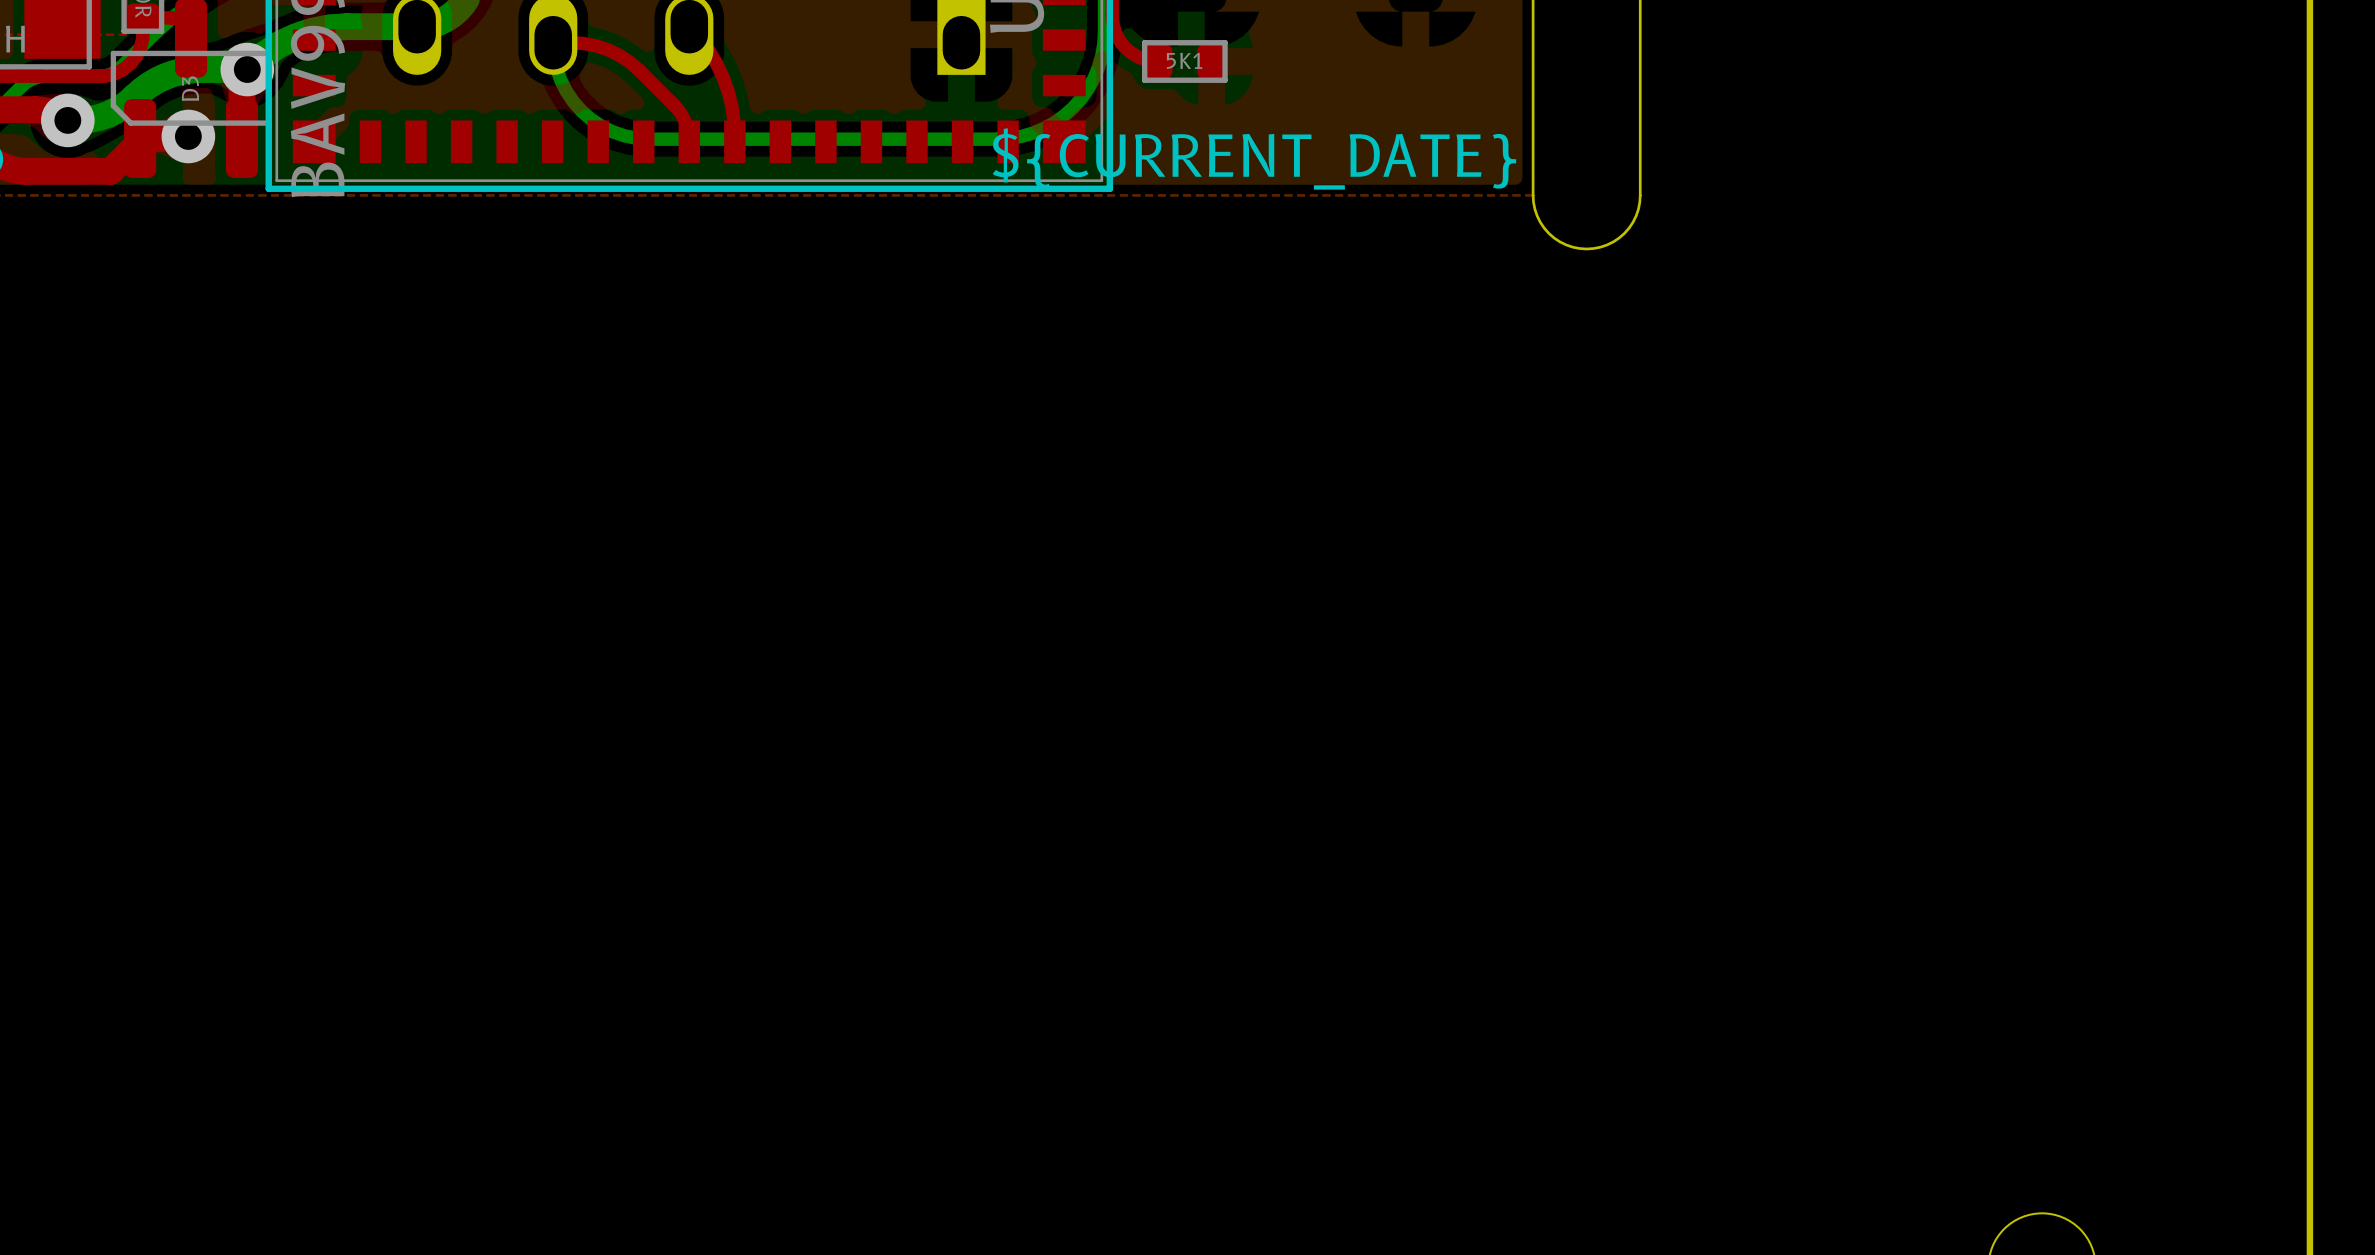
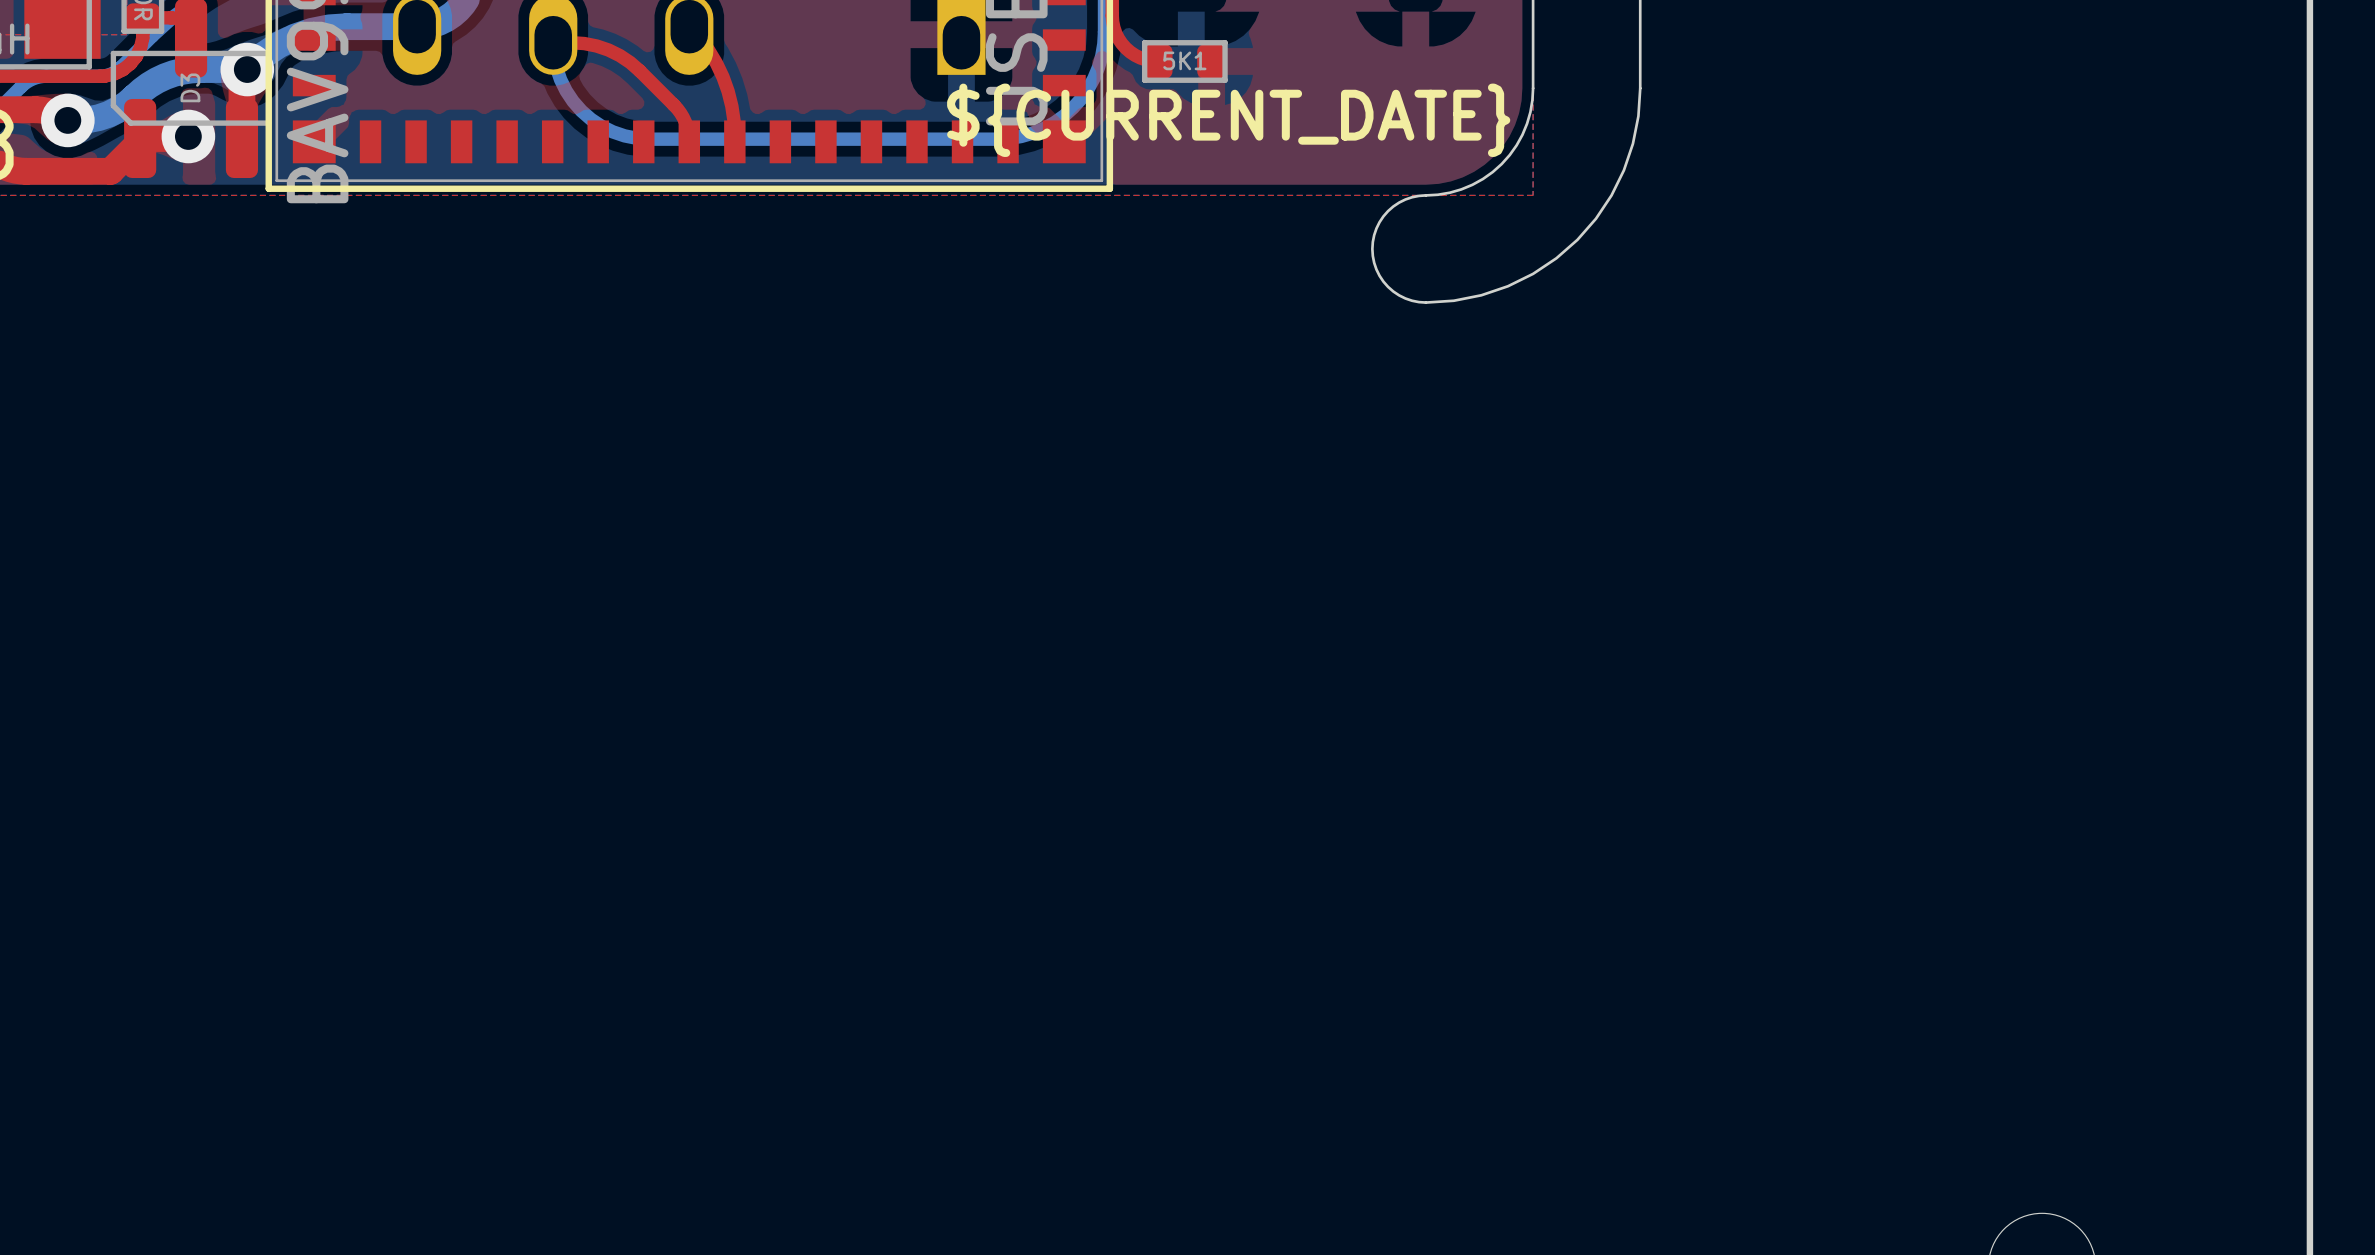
board edge: (1533, 88) (1533, 195) (1534, 209) (1544, 228) (1554, 237) (1566, 244) (1586, 248) (1607, 244) (1619, 237) (1629, 228) (1638, 209) (1640, 195) (1640, 88) -> (1533, 88) (1530, 112) (1522, 134) (1509, 155) (1492, 172) (1461, 189) (1405, 199) (1393, 206) (1379, 222) (1372, 242) (1374, 262) (1383, 281) (1399, 295) (1412, 300) (1425, 302) (1453, 300) (1481, 295) (1507, 286) (1533, 273) (1556, 258) (1577, 239) (1595, 218) (1611, 195) (1623, 170) (1632, 143) (1638, 116) (1640, 88)
text position: ${CURRENT_DATE} (1254, 158) -> ${CURRENT_DATE} (1228, 120)

